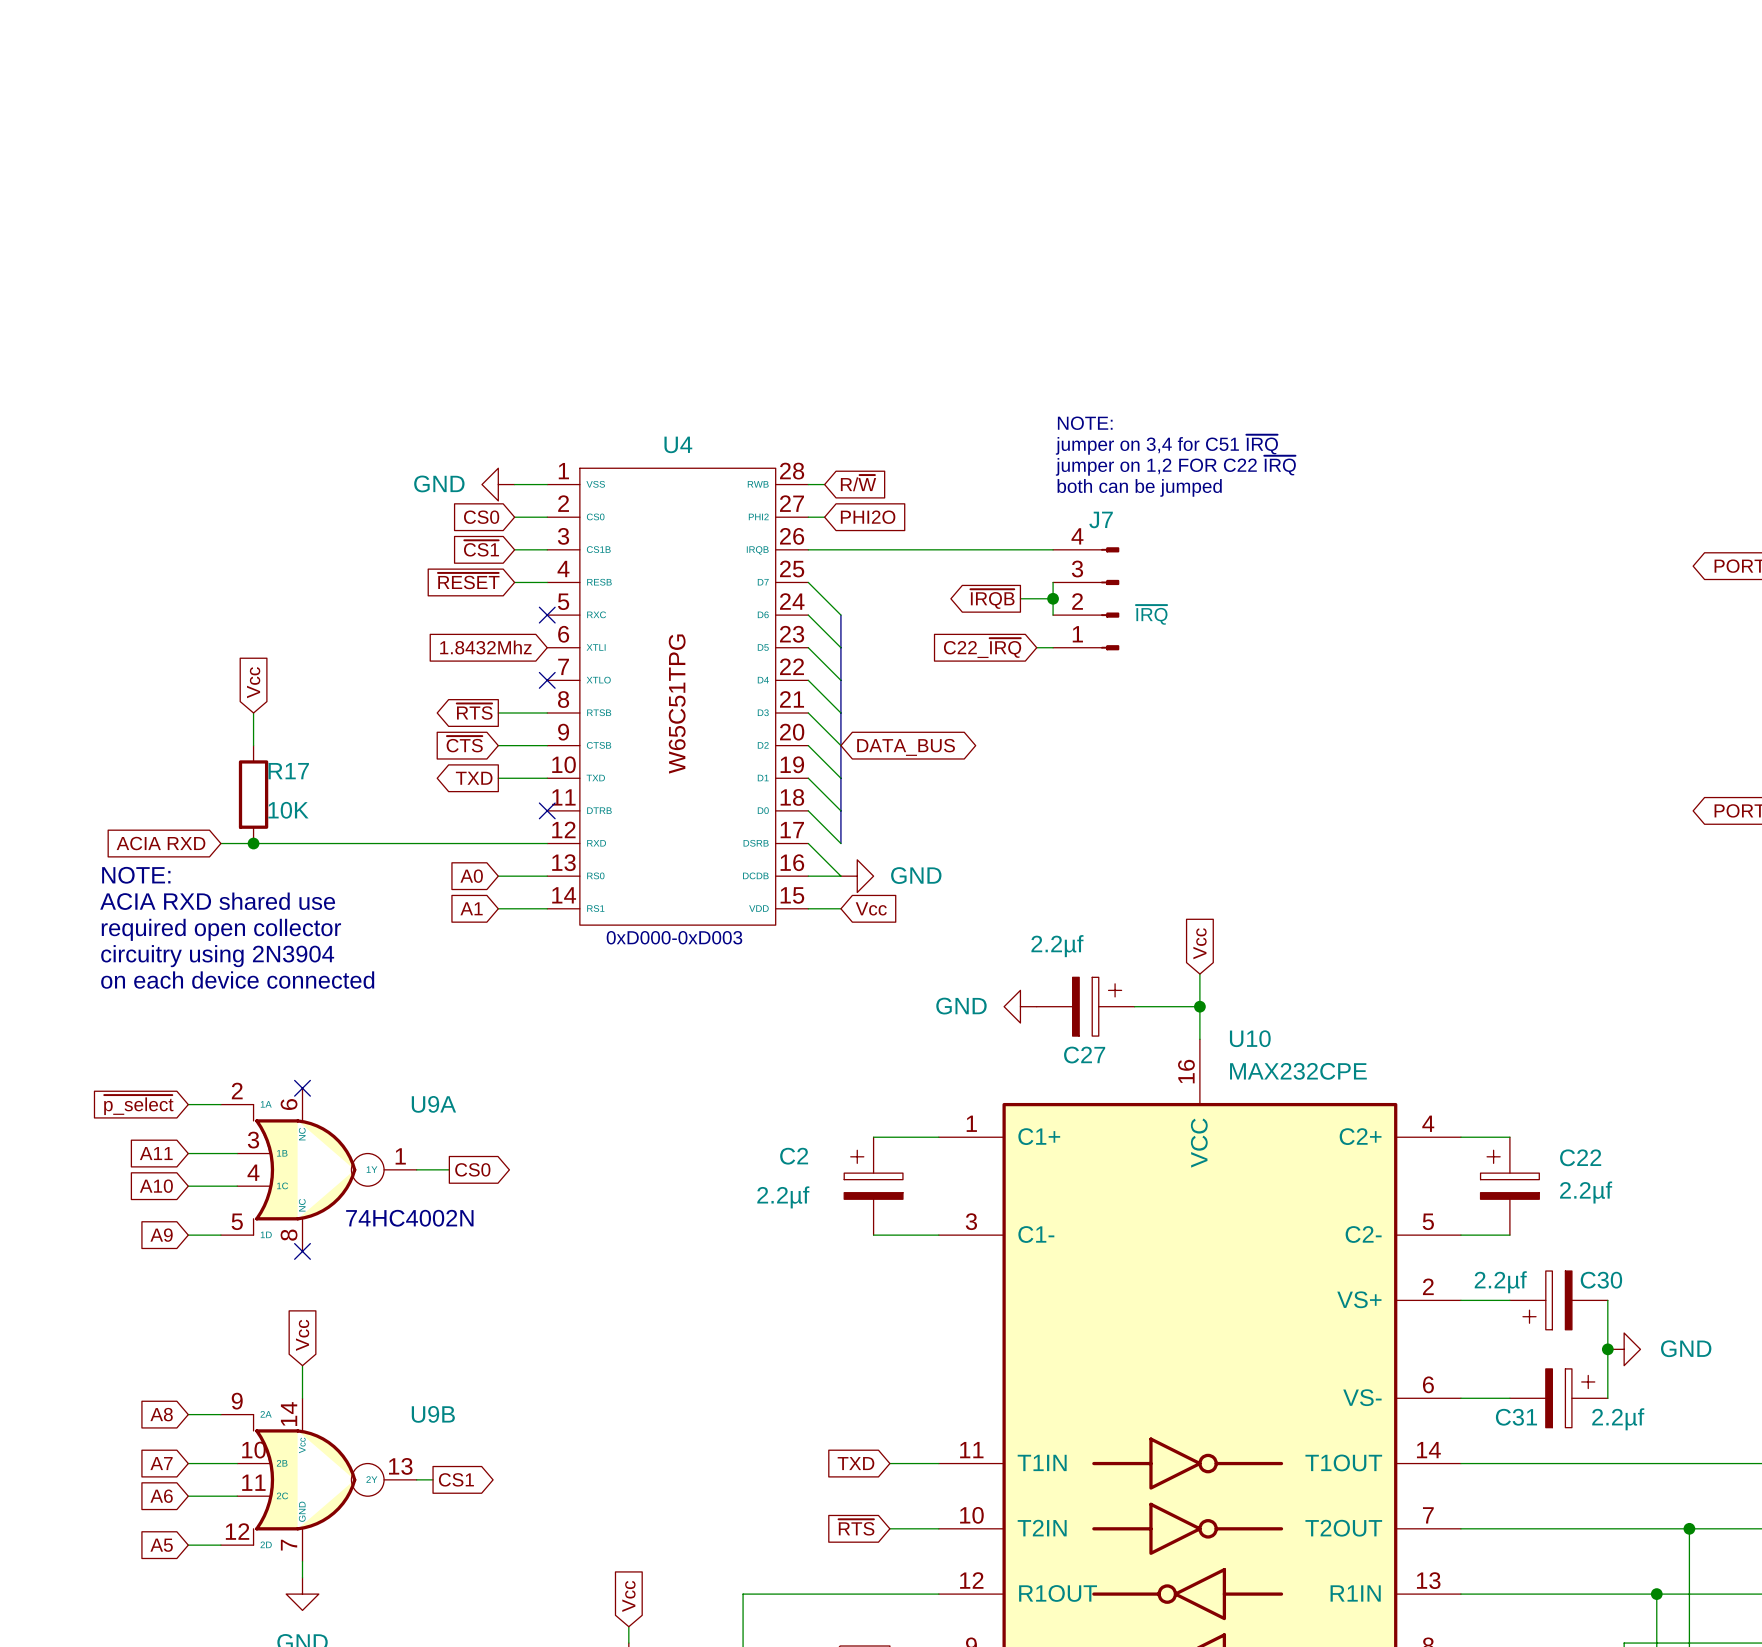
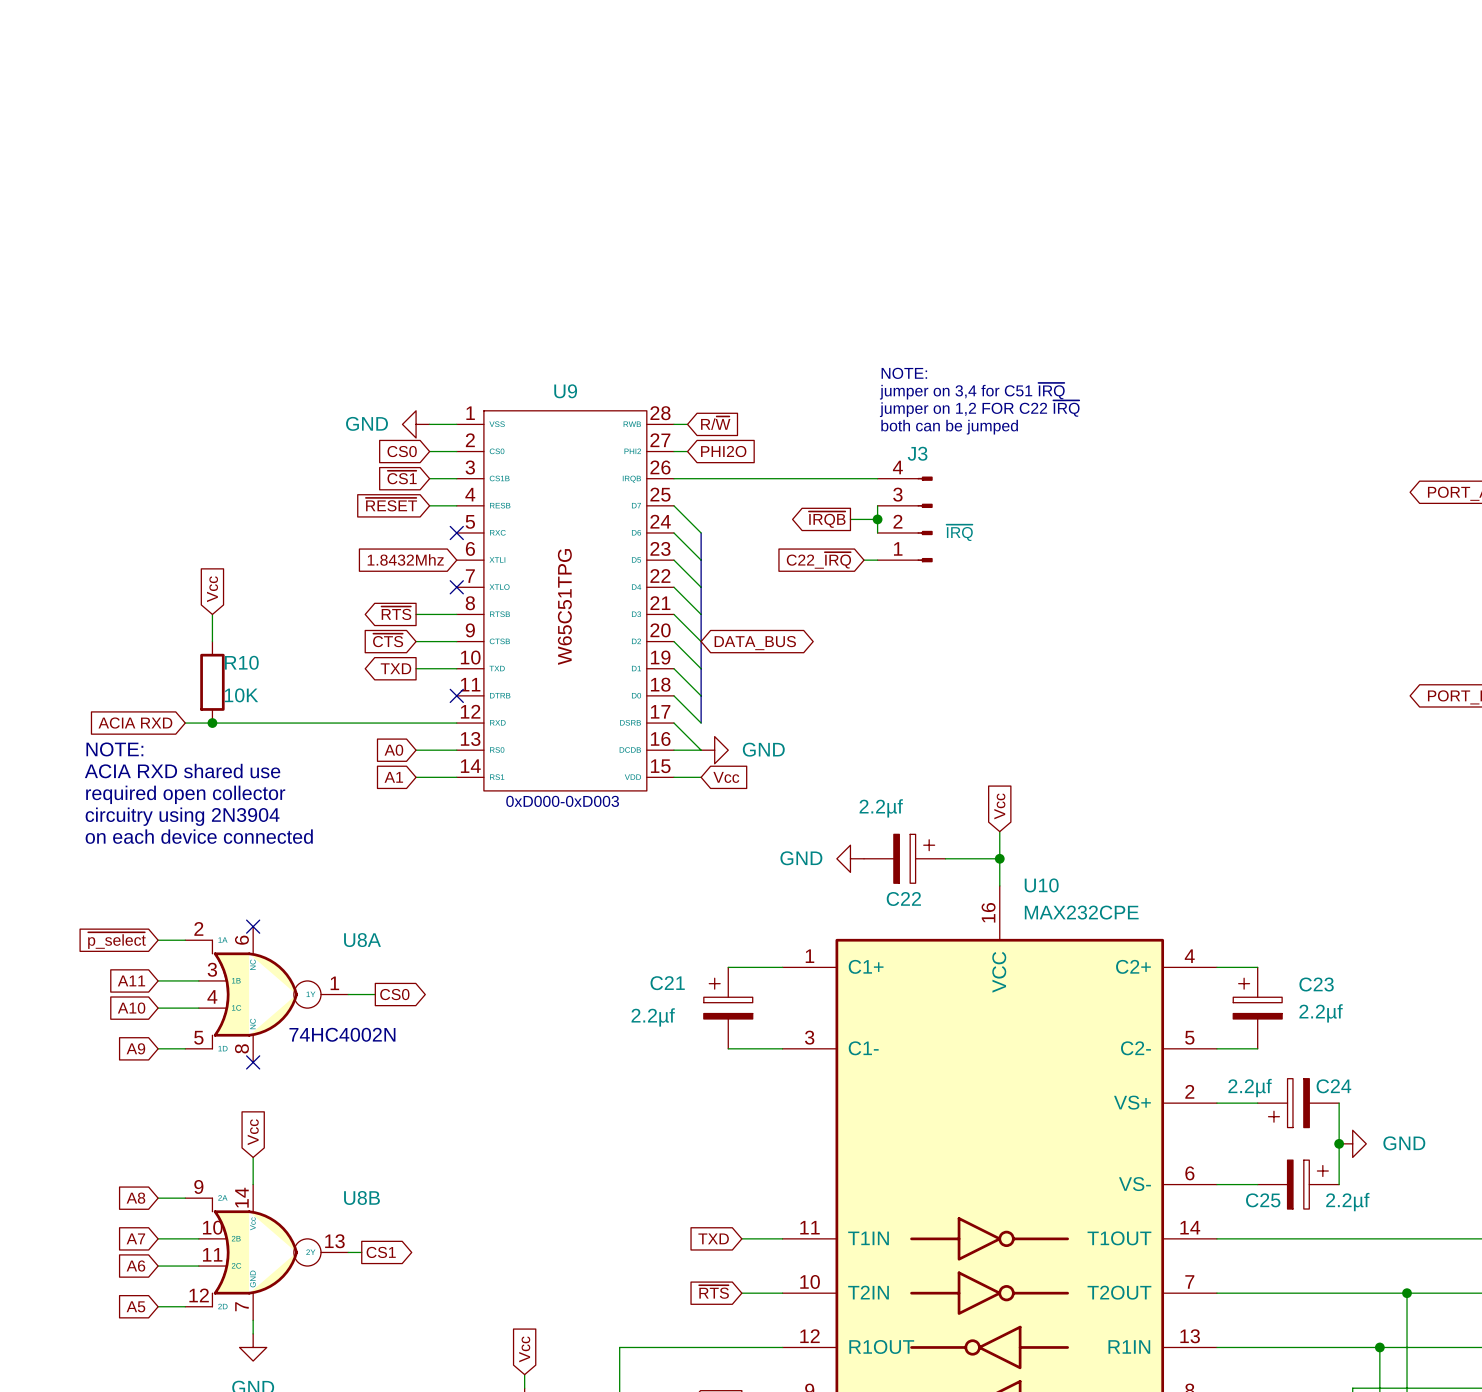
U4 name: U4 (678, 444) -> U9 (565, 391)
J7 name: J7 (1101, 519) -> J3 (917, 453)
R17 name: R17 (288, 771) -> R10 (241, 662)
C27 name: C27 (1084, 1055) -> C22 (903, 899)
U9A name: U9A (433, 1104) -> U8A (362, 940)
C2 name: C2 (794, 1156) -> C21 (667, 983)
C22 name: C22 (1580, 1157) -> C23 (1316, 984)
C30 name: C30 (1601, 1280) -> C24 (1333, 1086)
U9B name: U9B (433, 1414) -> U8B (361, 1197)
C31 name: C31 (1516, 1417) -> C25 (1263, 1200)

